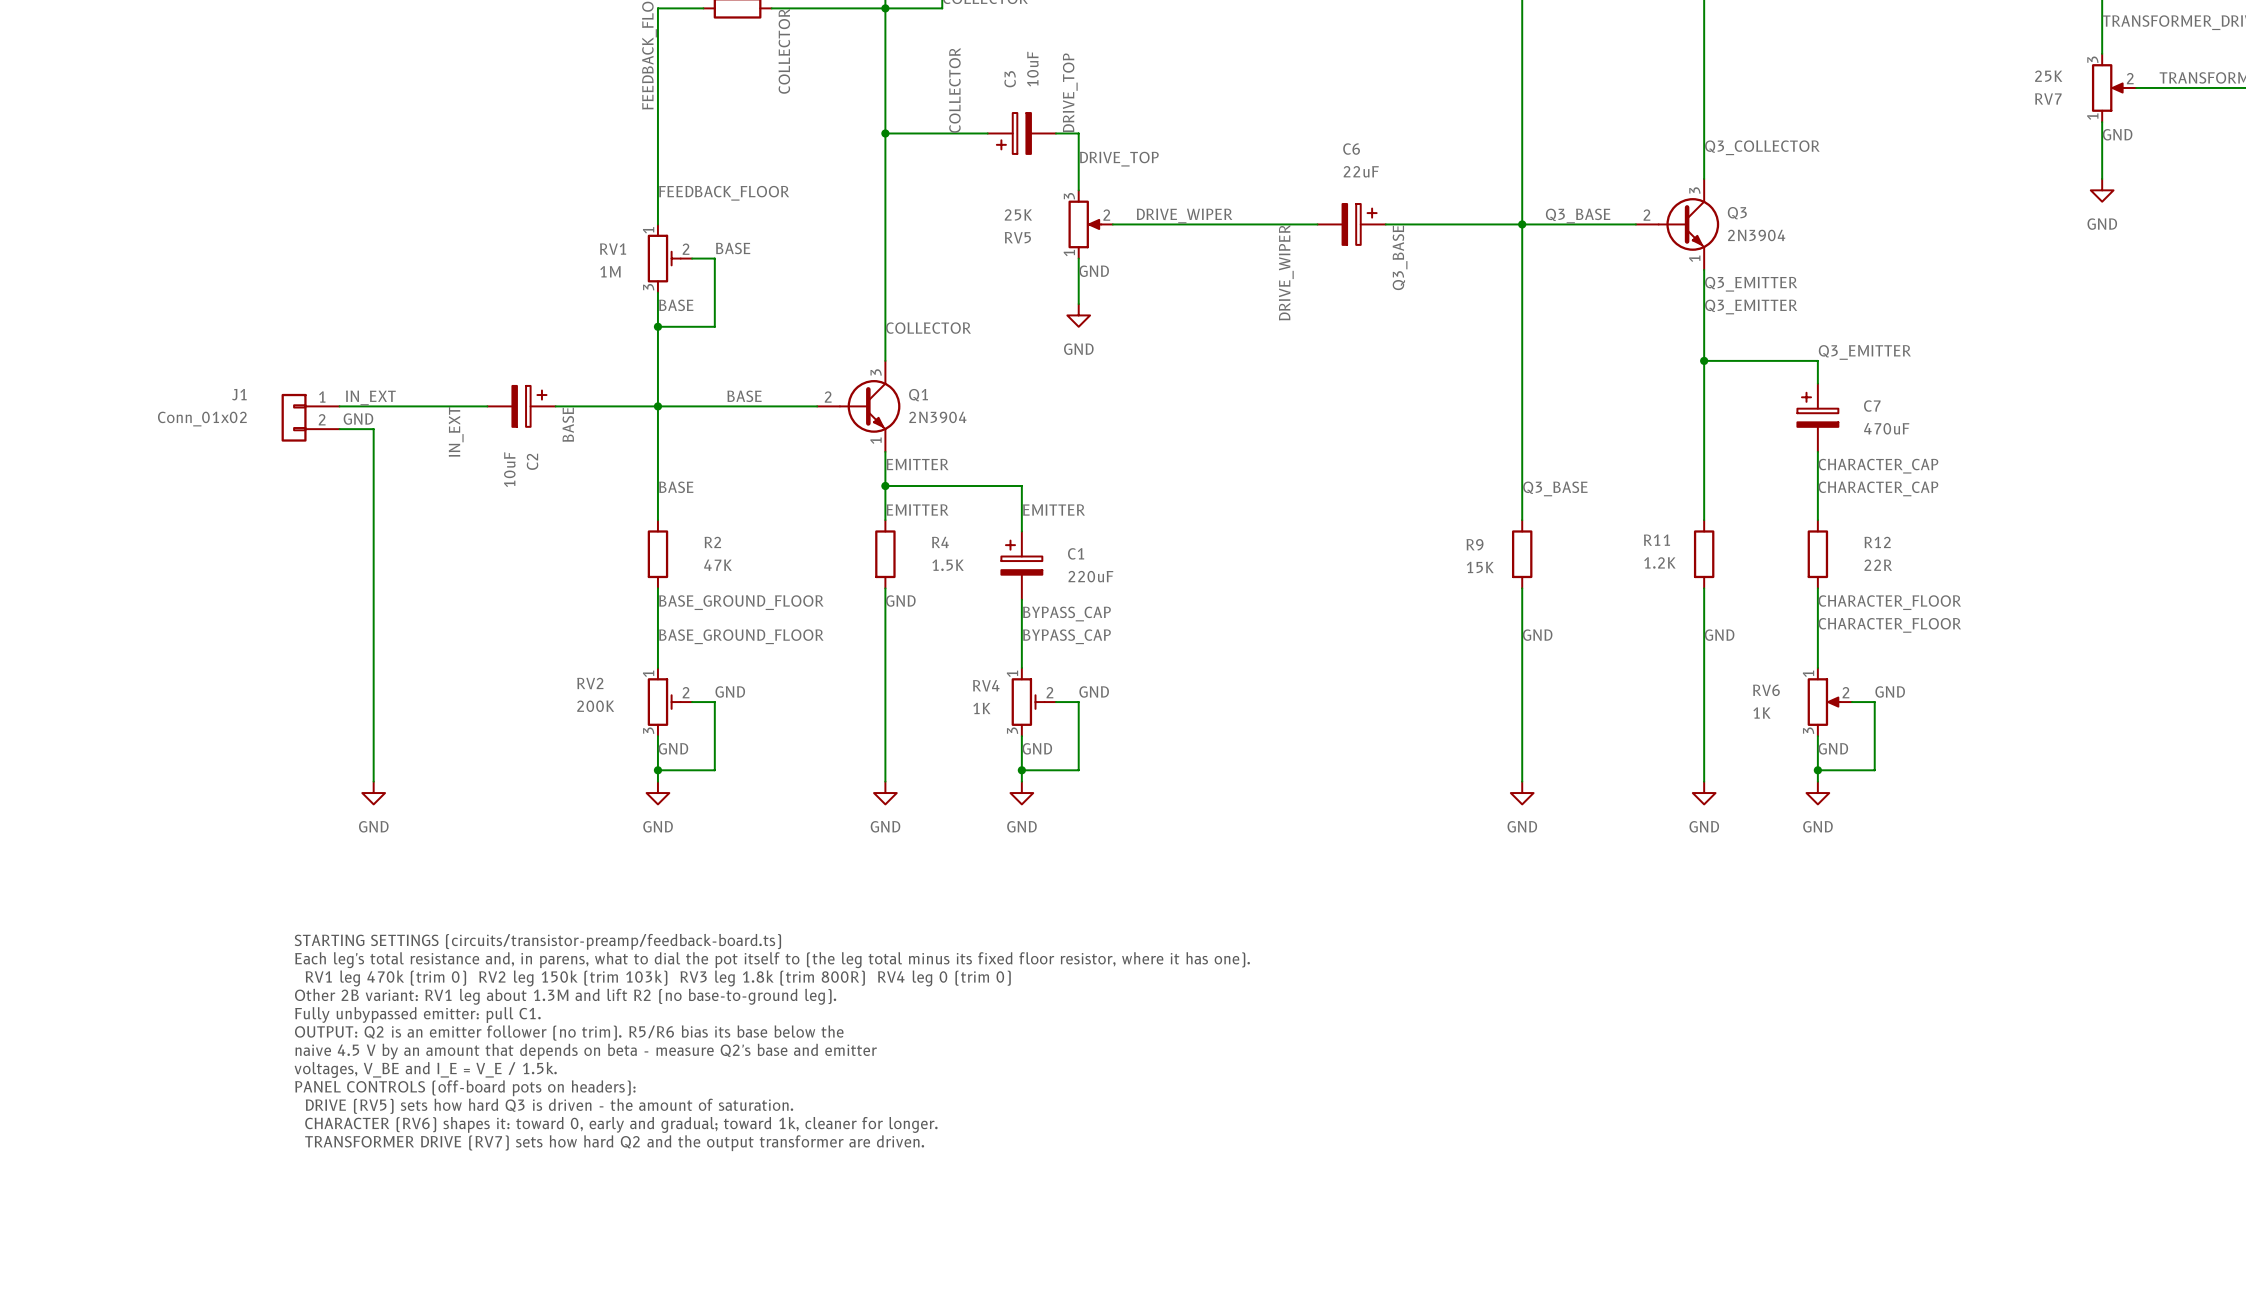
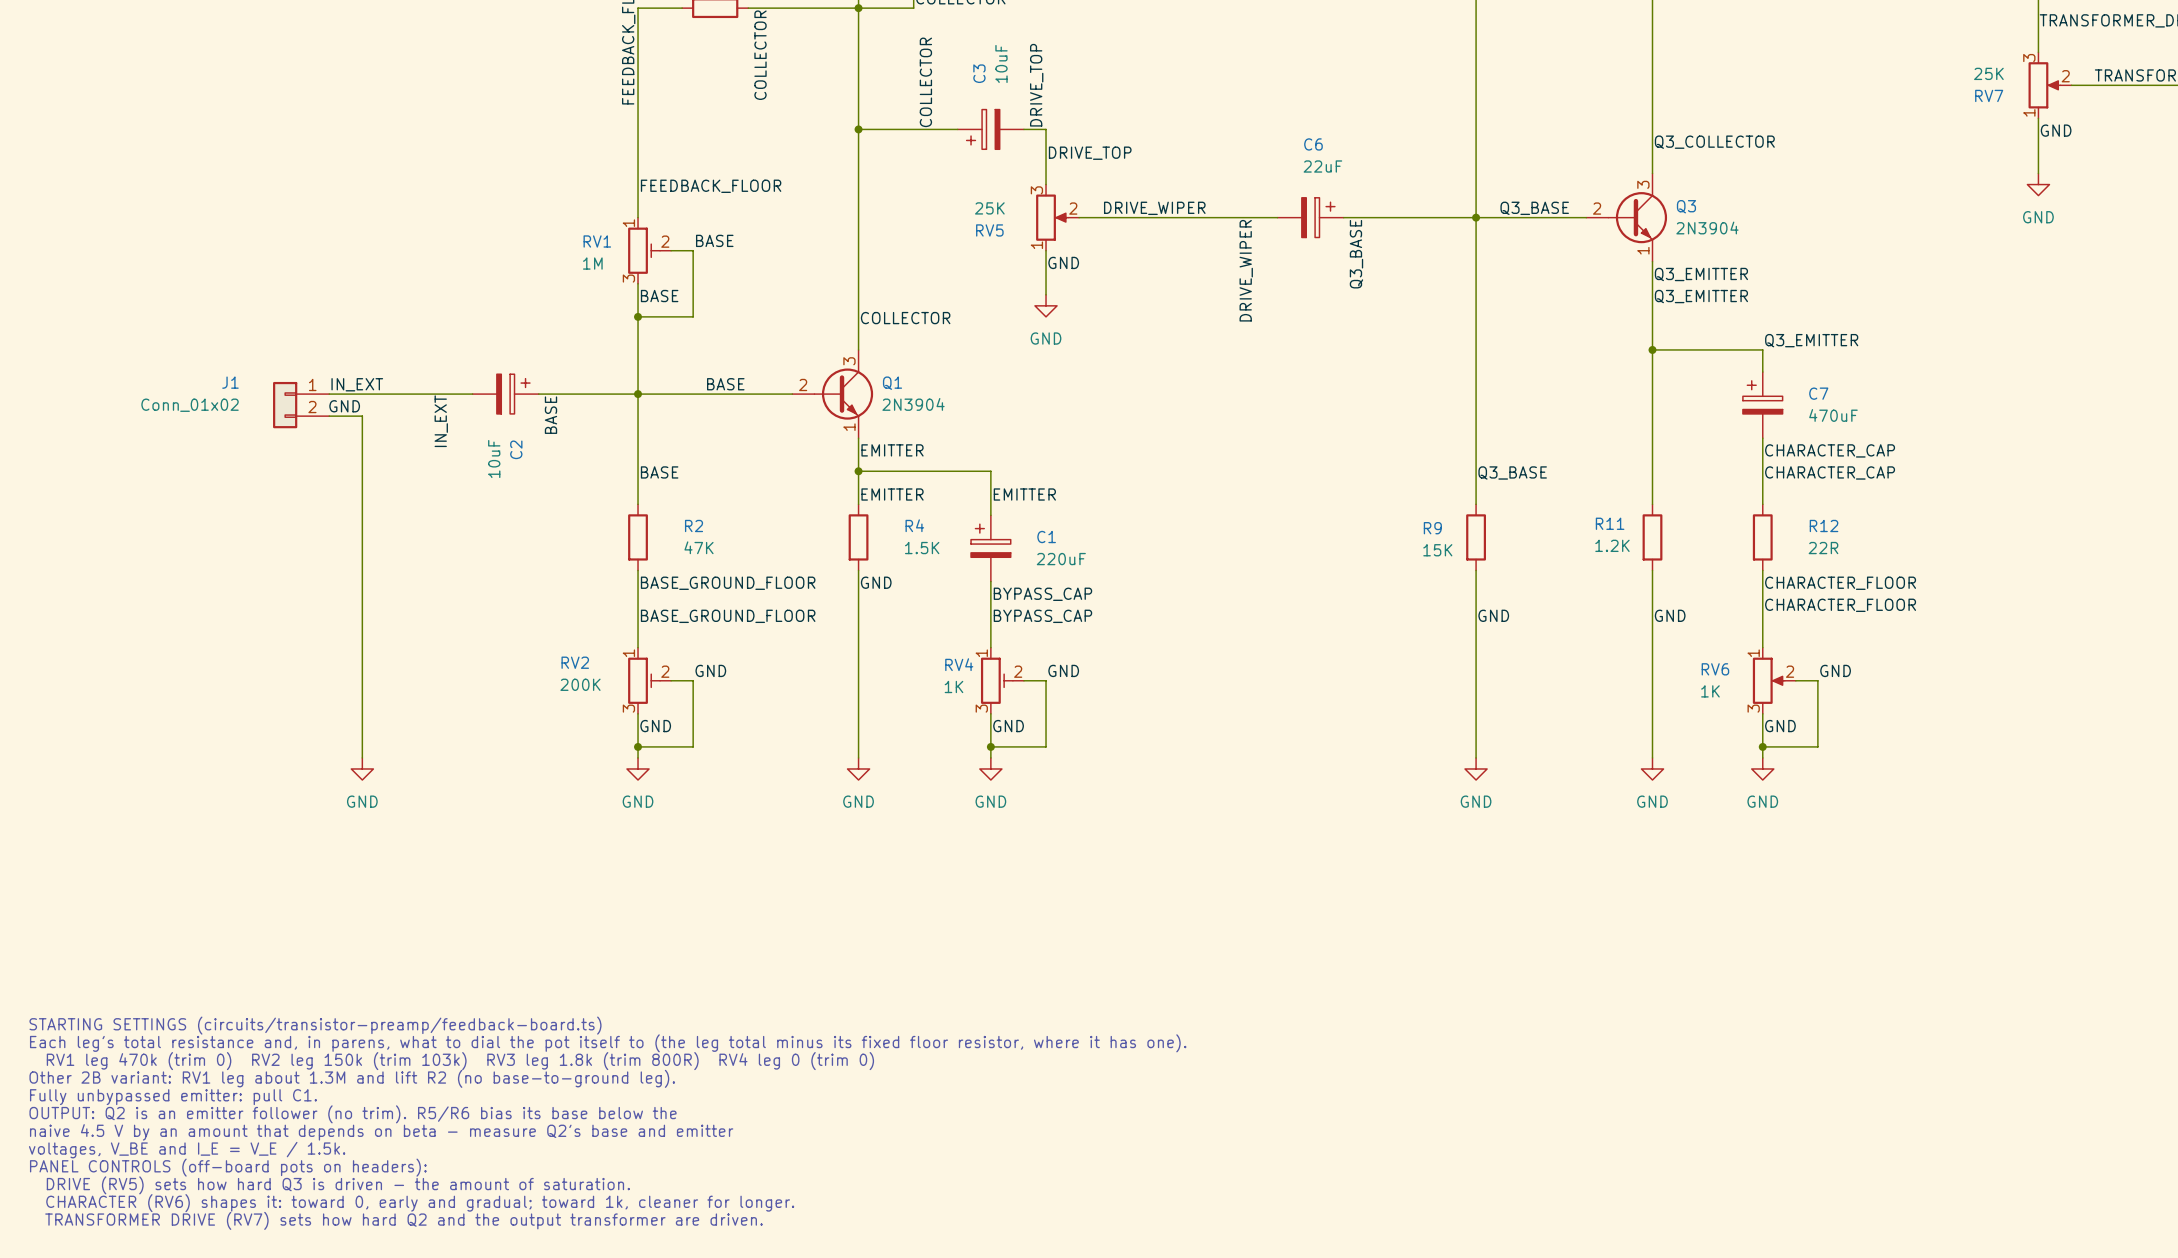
text: STARTING SETTINGS (circuits/transistor-preamp/feedback-board.ts) (537, 941) -> none
text: Each leg's total resistance and, in parens, what to dial the pot itself to (the leg total minus its fixed floor resistor, where it has one). (772, 960) -> none
text: RV1 leg 470k (trim 0) RV2 leg 150k (trim 103k) RV3 leg 1.8k (trim 800R) RV4 leg 0 (trim 0) (658, 978) -> none
text: Other 2B variant: RV1 leg about 1.3M and lift R2 (no base-to-ground leg). (565, 996) -> none
text: Fully unbypassed emitter: pull C1. (417, 1015) -> none
text: OUTPUT: Q2 is an emitter follower (no trim). R5/R6 bias its base below the (569, 1033) -> none
text: naive 4.5 V by an amount that depends on beta - measure Q2's base and emitter (586, 1051) -> none
text: none -> STARTING SETTINGS (circuits/transistor-preamp/feedback-board.ts) (315, 1025)
text: voltages, V_BE and I_E = V_E / 1.5k. (425, 1070) -> none
text: none -> Each leg's total resistance and, in parens, what to dial the pot itself to (the leg total minus its fixed floor resistor, where it has one). (608, 1043)
text: PANEL CONTROLS (off-board pots on headers): (465, 1088) -> none
text: none -> RV1 leg 470k (trim 0) RV2 leg 150k (trim 103k) RV3 leg 1.8k (trim 800R) RV4 leg 0 (trim 0) (460, 1061)
text: DRIVE (RV5) sets how hard Q3 is driven - the amount of saturation. (549, 1106) -> none
text: none -> Other 2B variant: RV1 leg about 1.3M and lift R2 (no base-to-ground leg). (352, 1078)
text: CHARACTER (RV6) shapes it: toward 0, early and gradual; toward 1k, cleaner for longer. (621, 1124) -> none
text: none -> Fully unbypassed emitter: pull C1. (173, 1097)
text: TRANSFORMER DRIVE (RV7) sets how hard Q2 and the output transformer are driven. (614, 1143) -> none
text: none -> OUTPUT: Q2 is an emitter follower (no trim). R5/R6 bias its base below the (353, 1114)
text: none -> naive 4.5 V by an amount that depends on beta - measure Q2's base and emitter (381, 1132)
text: none -> voltages, V_BE and I_E = V_E / 1.5k. (187, 1150)
text: none -> PANEL CONTROLS (off-board pots on headers): (228, 1167)
text: none -> DRIVE (RV5) sets how hard Q3 is driven - the amount of saturation. (338, 1185)
text: none -> CHARACTER (RV6) shapes it: toward 0, early and gradual; toward 1k, cleaner for longer. (420, 1203)
text: none -> TRANSFORMER DRIVE (RV7) sets how hard Q2 and the output transformer are driven. (403, 1220)

